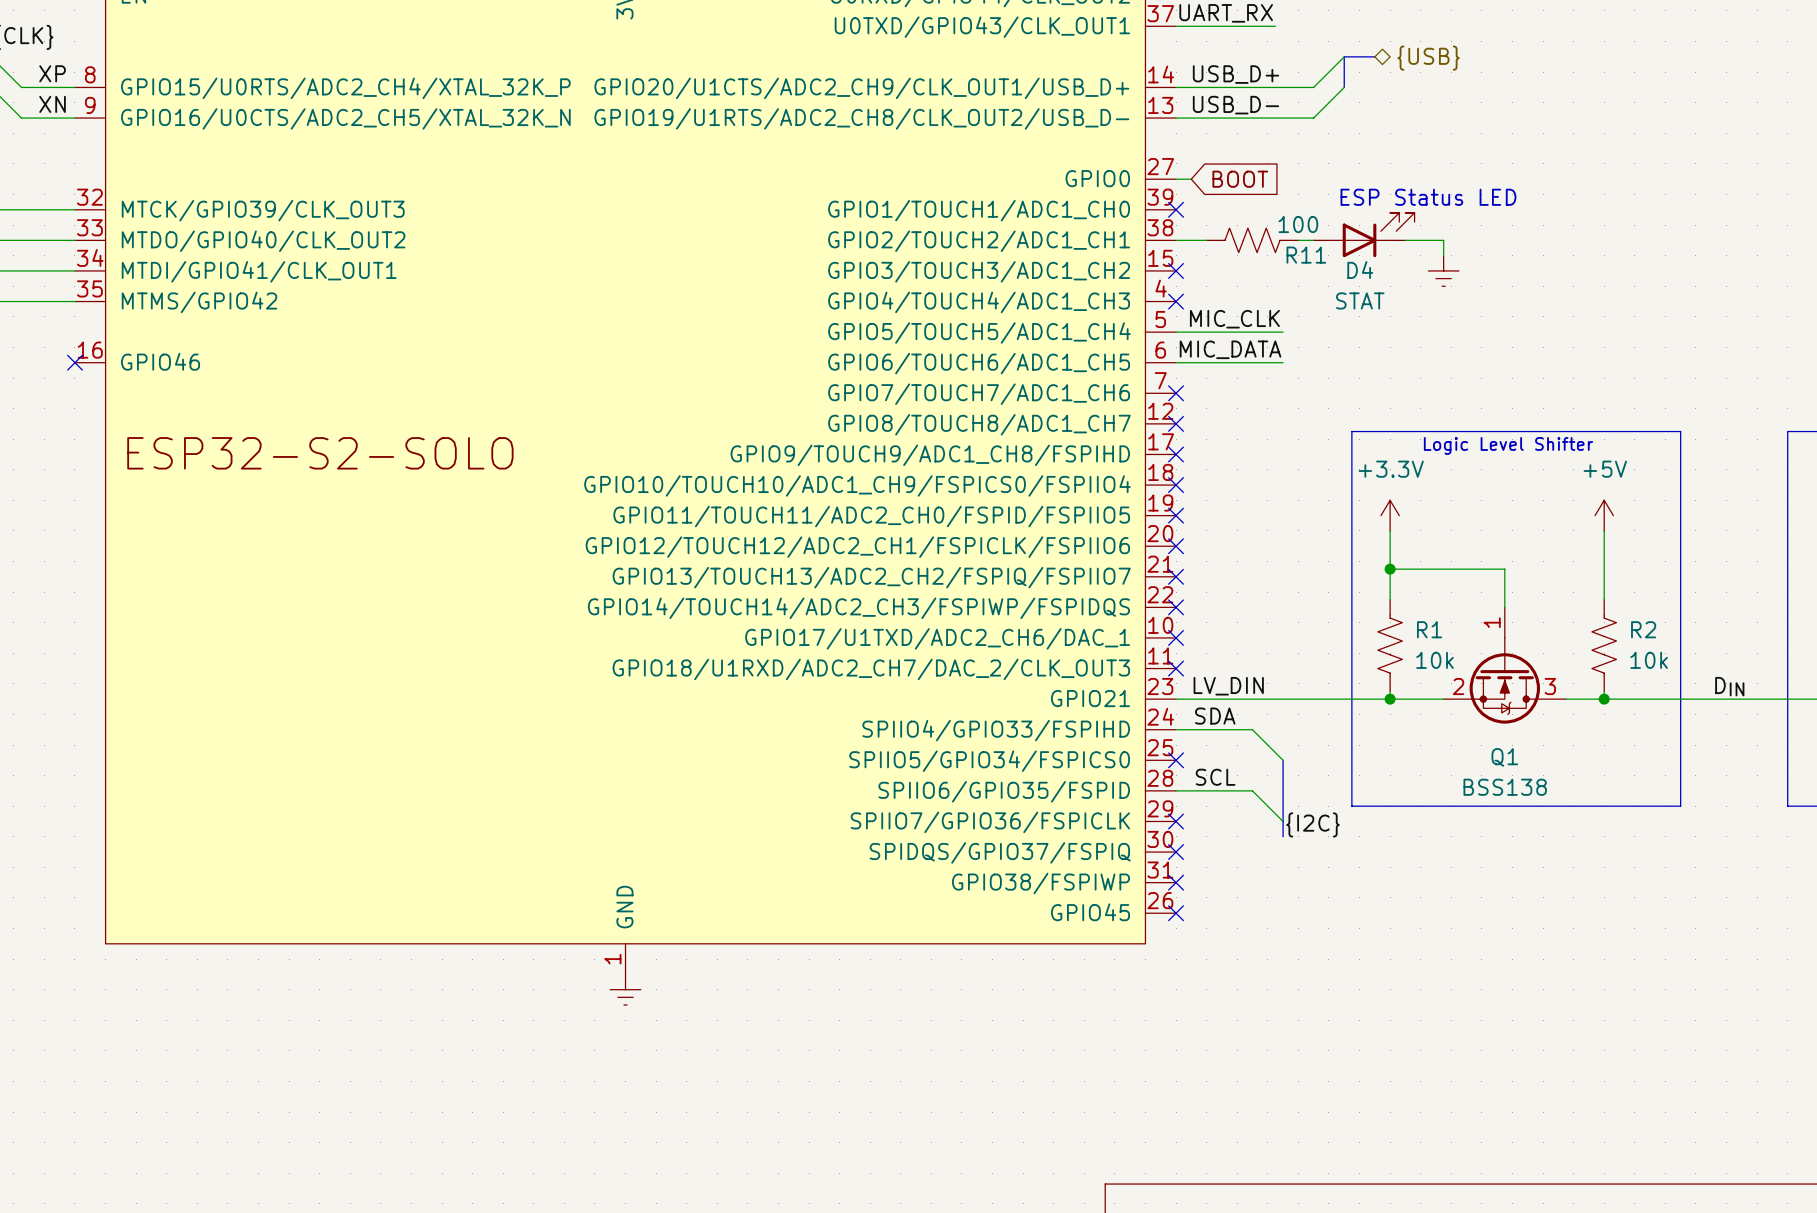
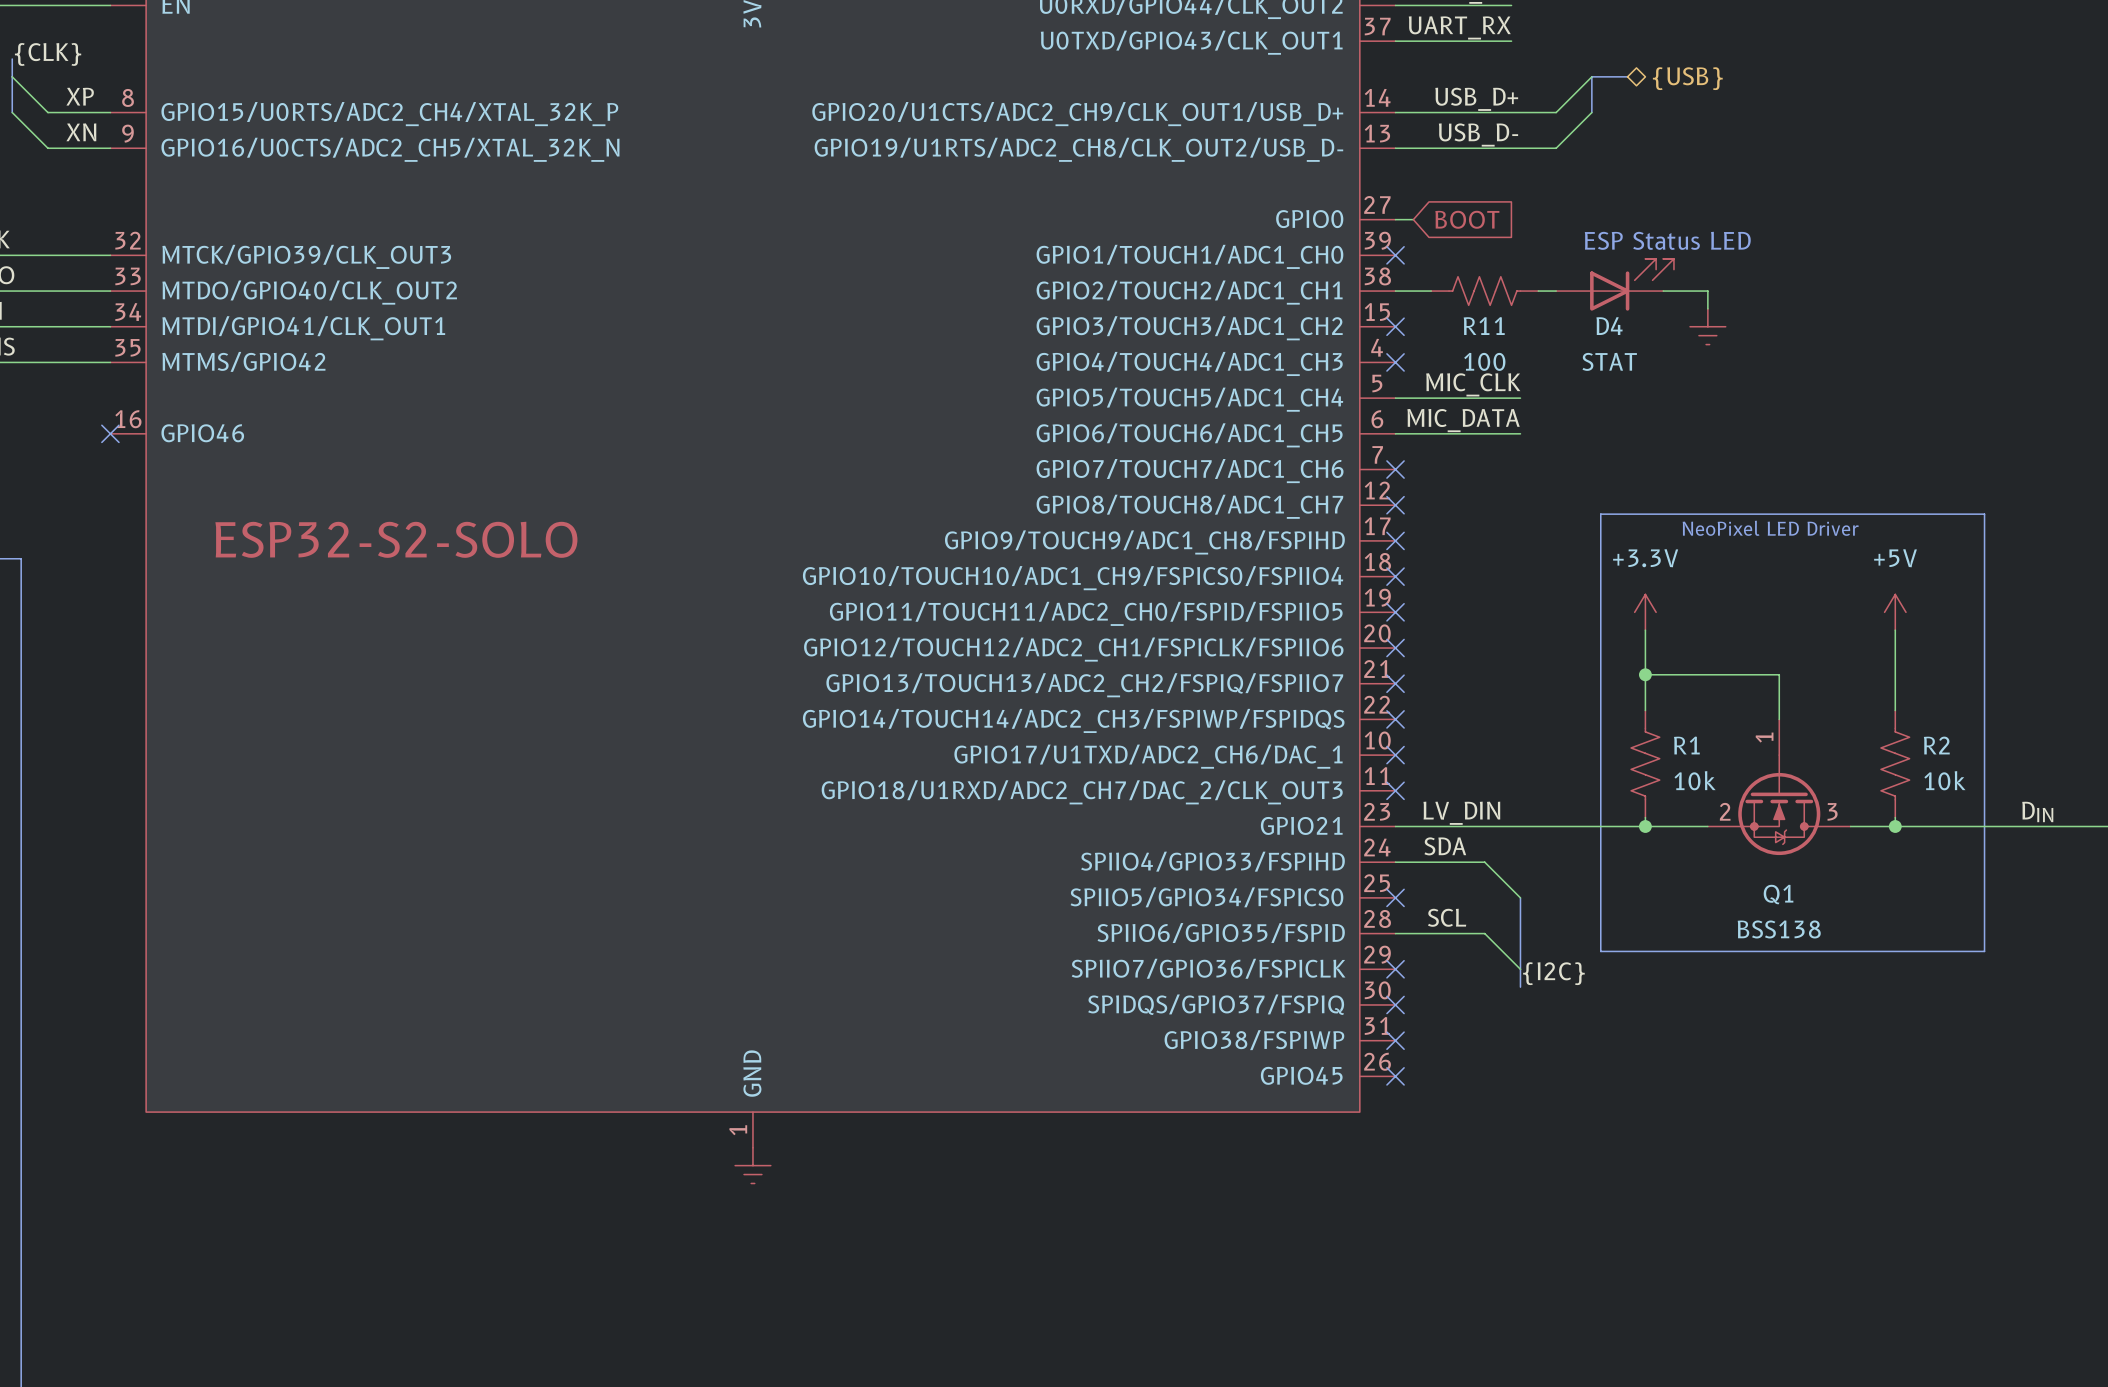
R11 value position: 100 (1298, 224) -> 100 (1484, 361)
R11 name position: R11 (1306, 255) -> R11 (1484, 326)
text: Logic Level Shifter (1508, 445) -> NeoPixel LED Driver (1770, 528)

